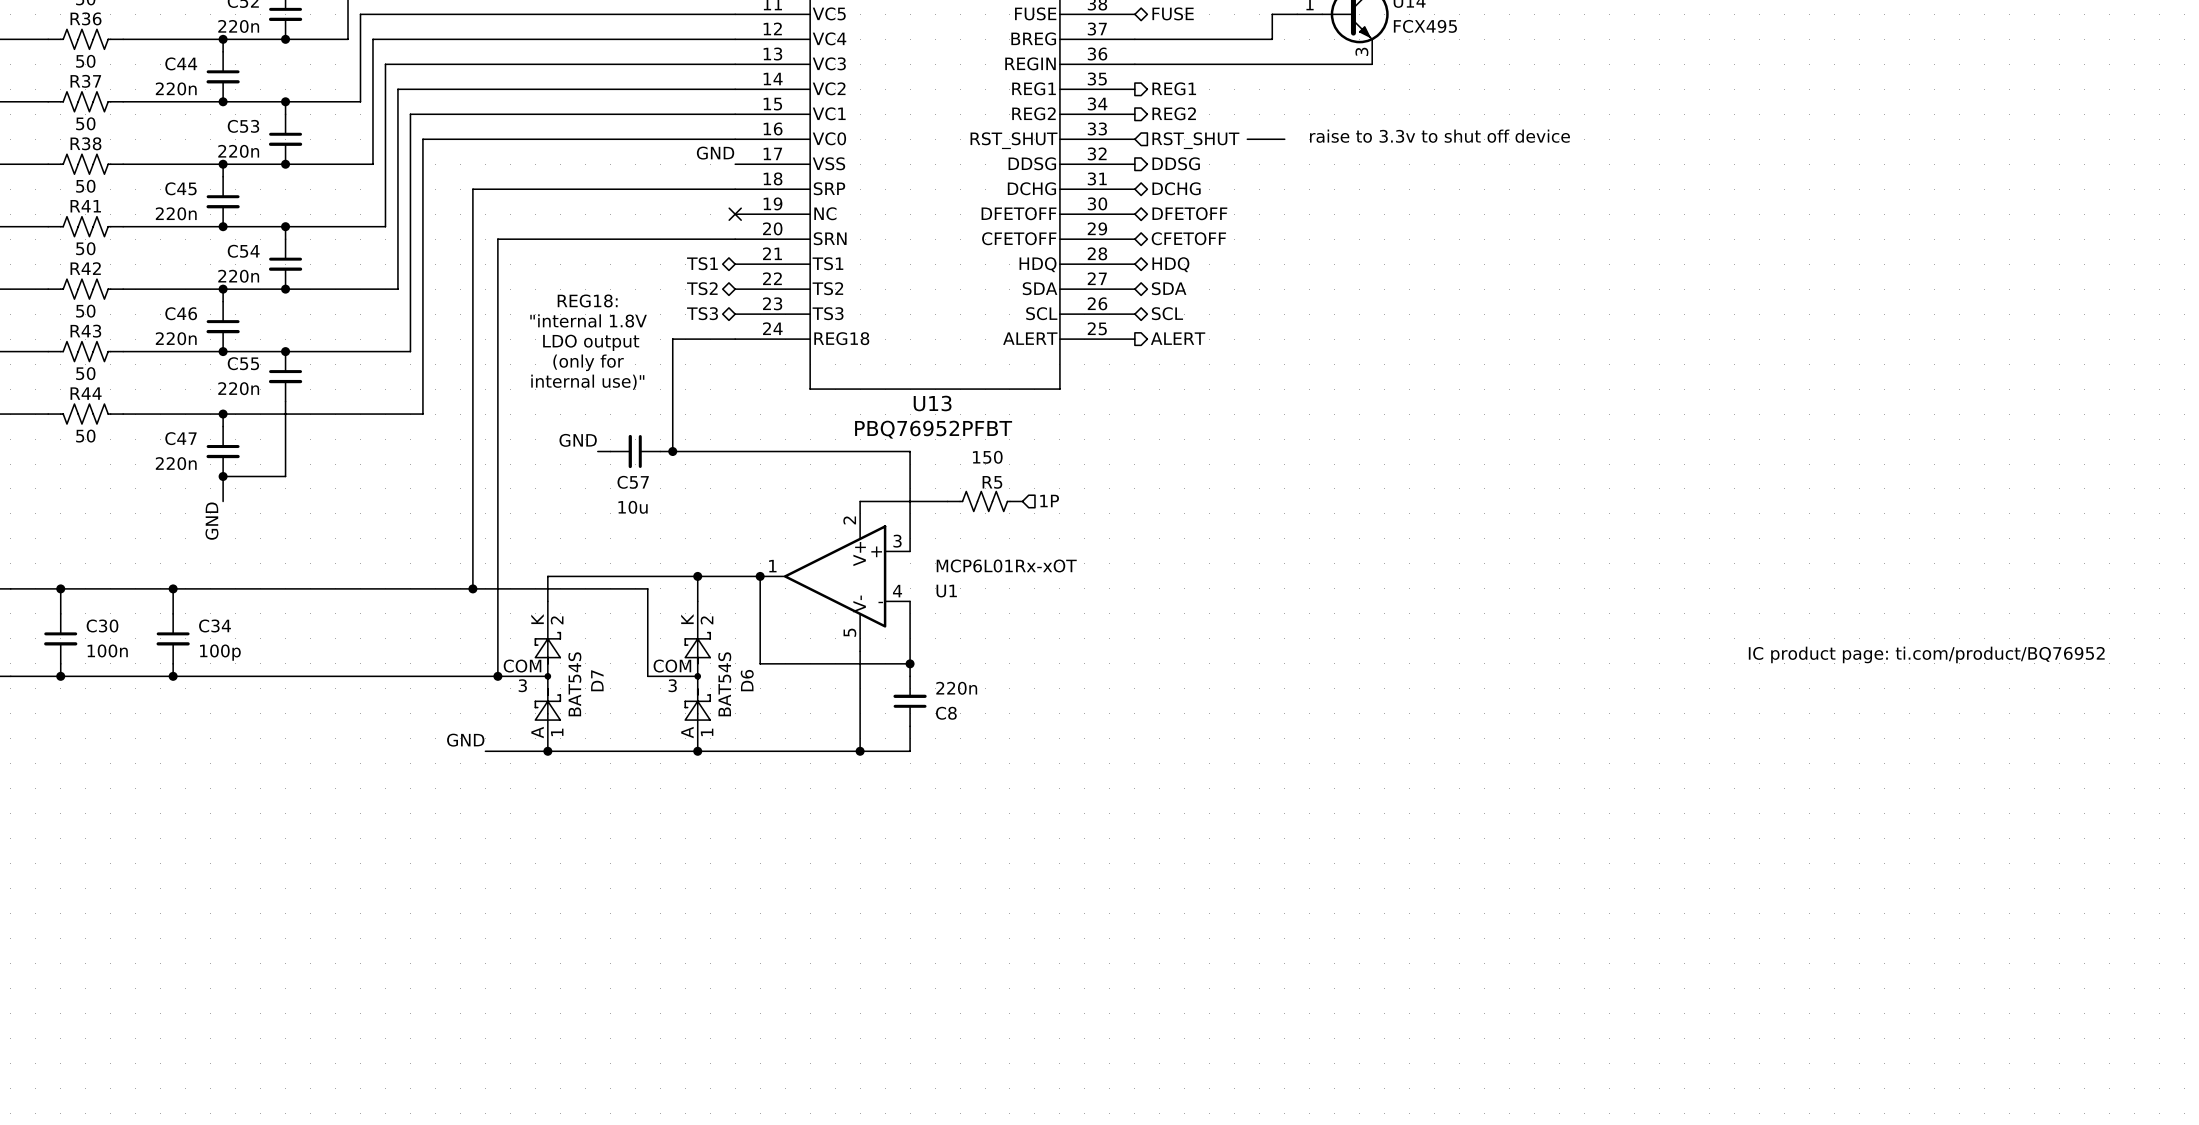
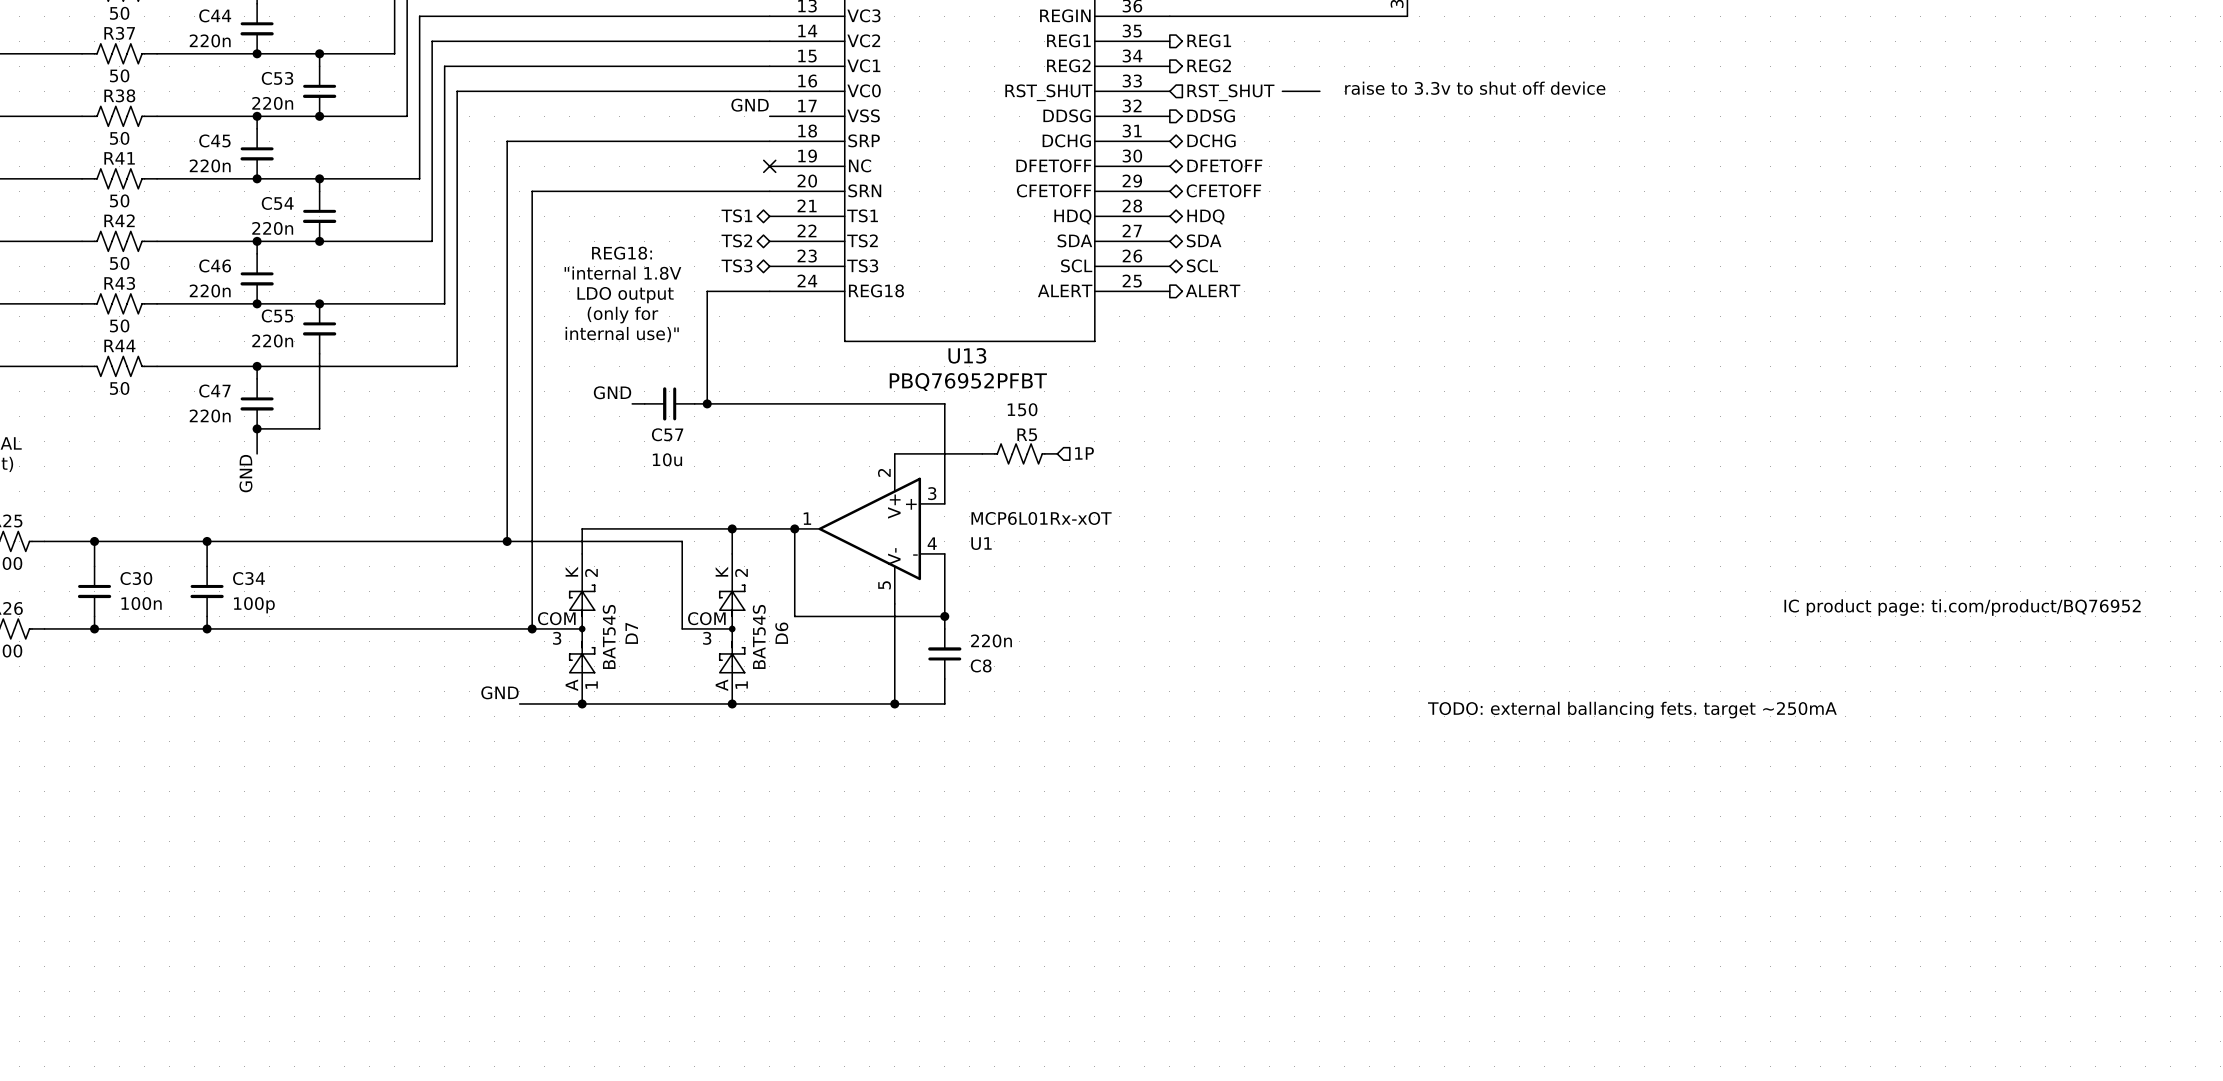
text: none -> TODO: external ballancing fets. target ~250mA (1632, 710)

